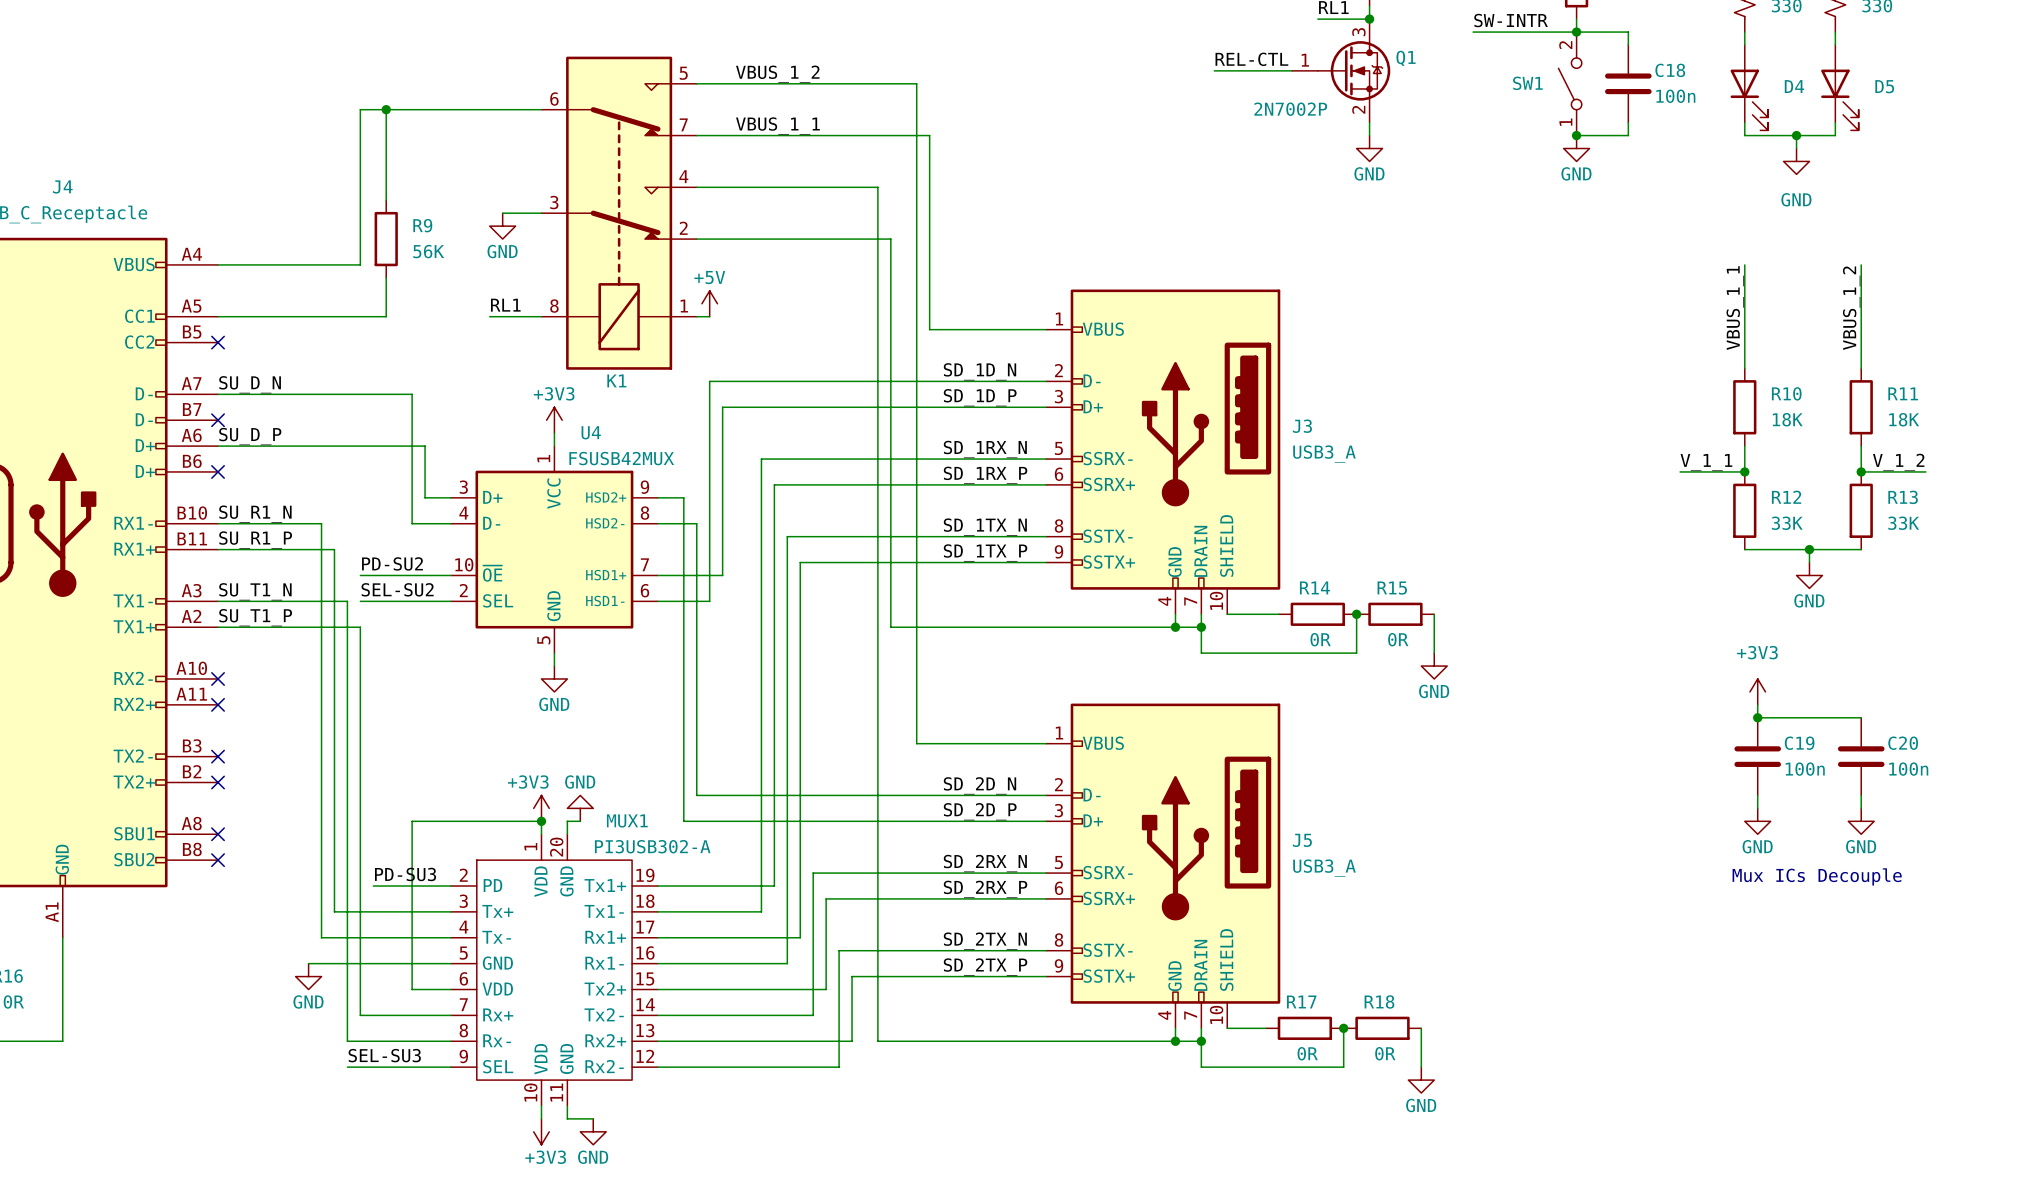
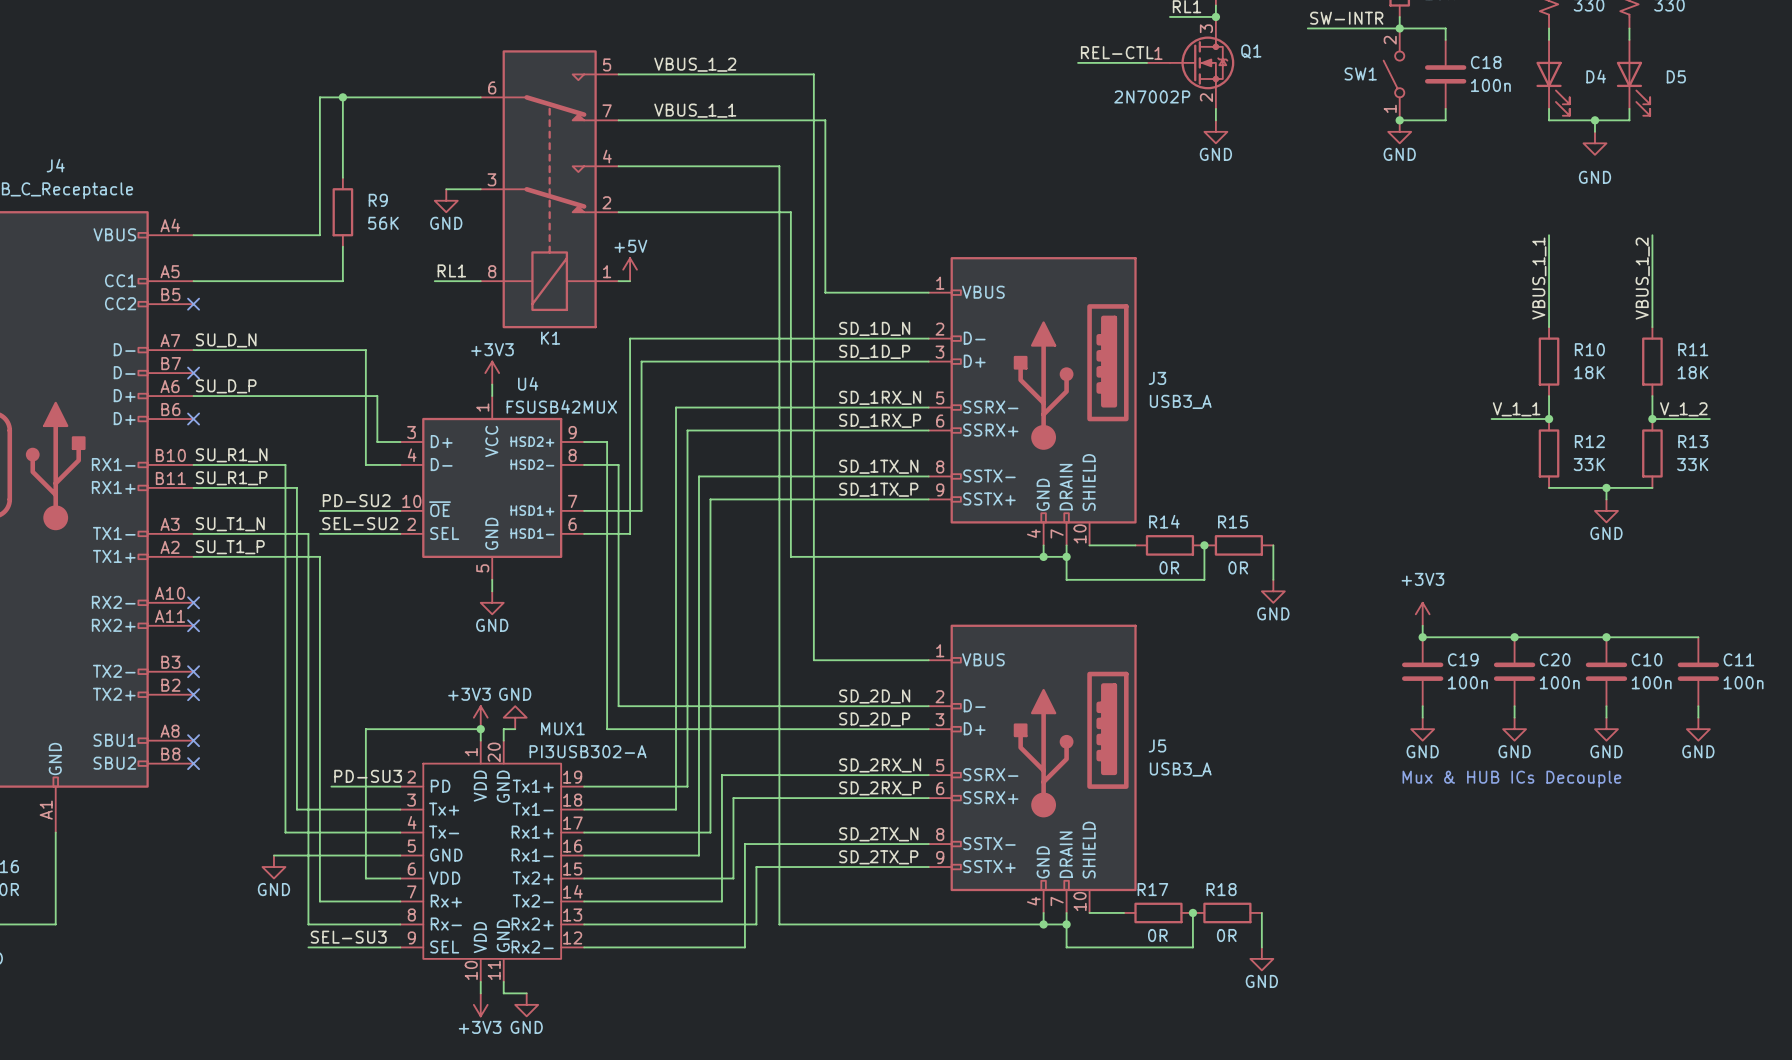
power symbol position: +3V3 (1757, 691) -> +3V3 (1422, 614)
wire: (1757, 704) (1757, 717) -> (1422, 625) (1422, 637) (1560, 637)
junction: none -> (1422, 637)
junction: none -> (1514, 637)
junction: (1757, 717) -> none
junction: none -> (1606, 637)
wire: none -> (1652, 637) (1698, 637)
C19 position: (1757, 756) -> (1422, 671)
C10: none -> 100n (1606, 671)
C20 position: (1861, 756) -> (1514, 671)
C11: none -> 100n (1698, 671)
wire: none -> (1422, 706) (1422, 717)
wire: (1757, 795) (1757, 808) -> (1514, 706) (1514, 717)
wire: (1861, 795) (1861, 808) -> (1606, 706) (1606, 717)
wire: none -> (1698, 706) (1698, 717)
power symbol: none -> GND (1422, 729)
power symbol: none -> GND (1514, 729)
power symbol: GND (1757, 821) -> none
power symbol: none -> GND (1606, 729)
power symbol: GND (1861, 821) -> none
power symbol: none -> GND (1698, 729)
text: Mux ICs Decouple (1817, 876) -> Mux & HUB ICs Decouple (1511, 779)

